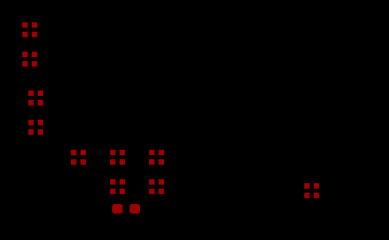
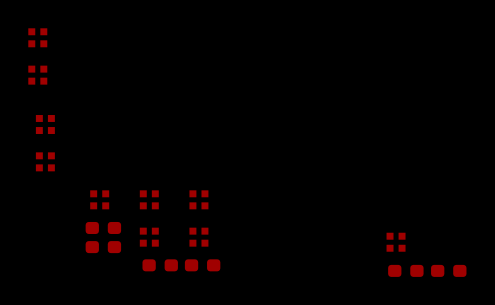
part: none -> (103, 227)
part: none -> (103, 247)
part: none -> (202, 265)
part: none -> (405, 270)
part: none -> (448, 270)

